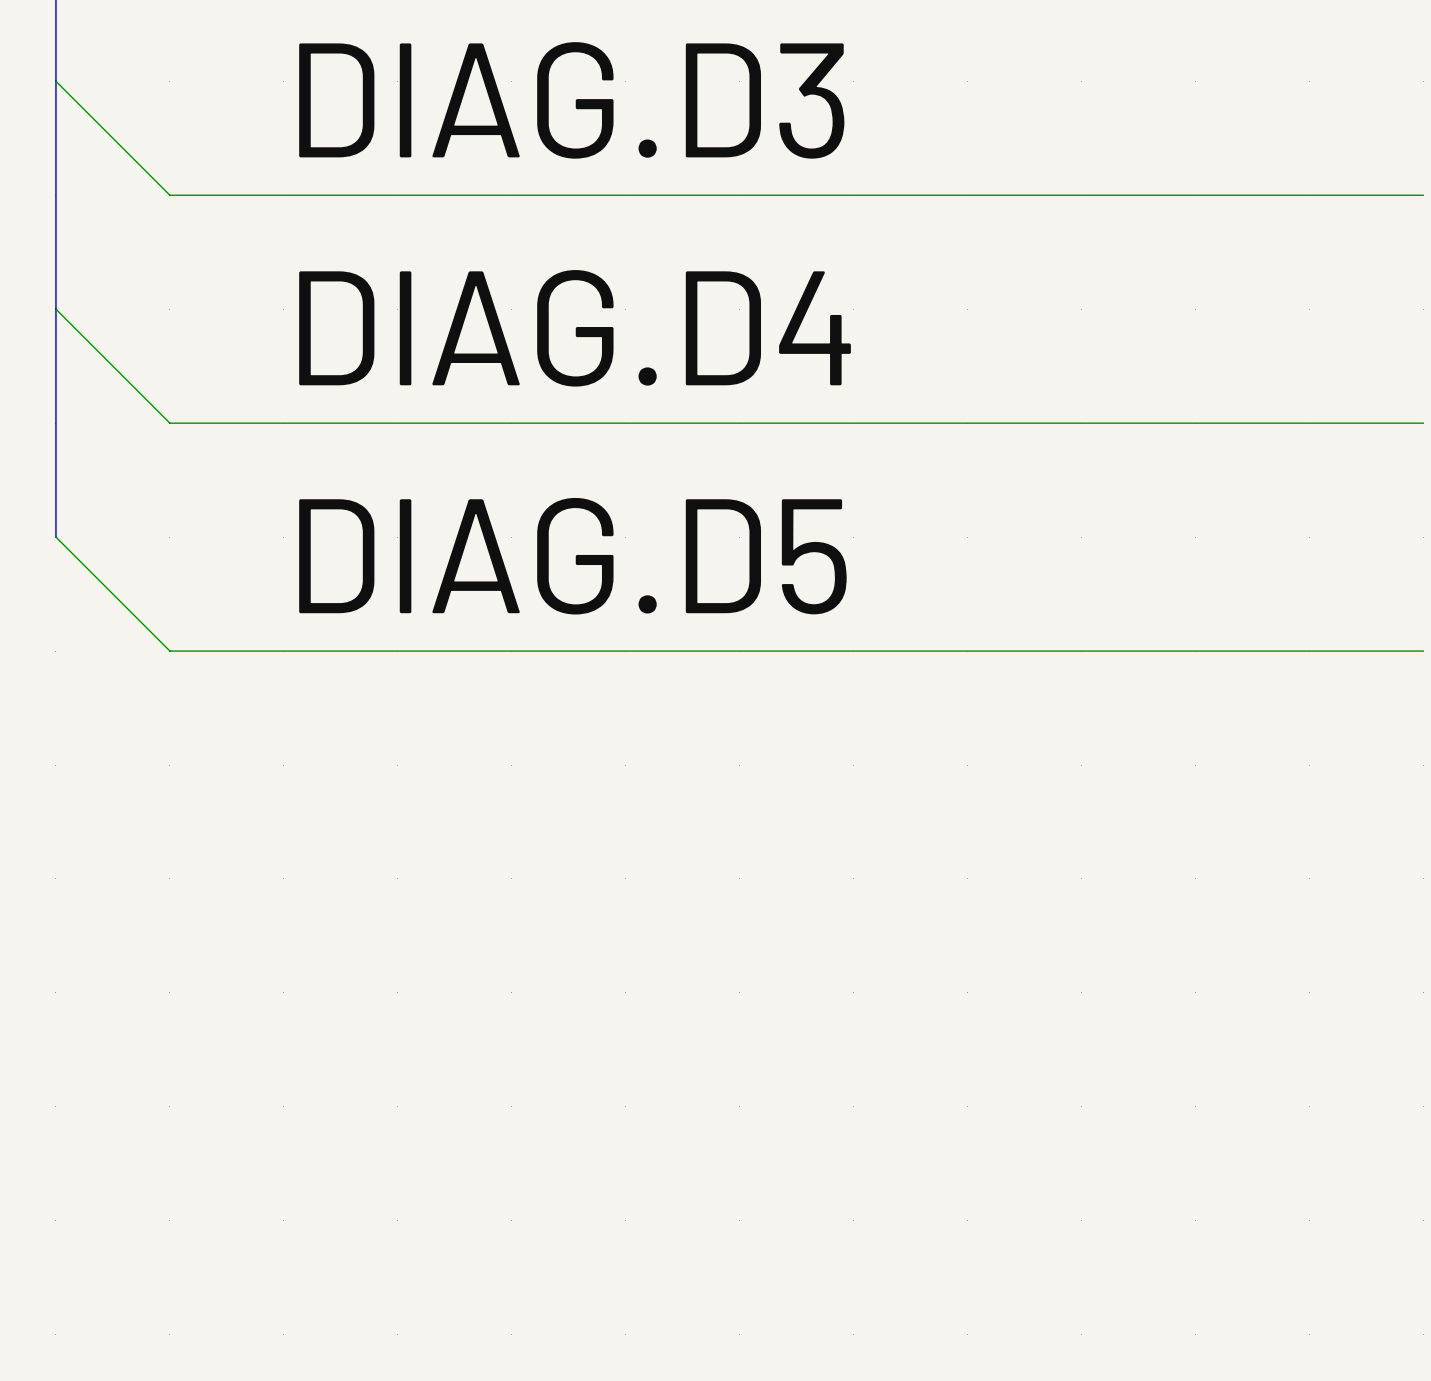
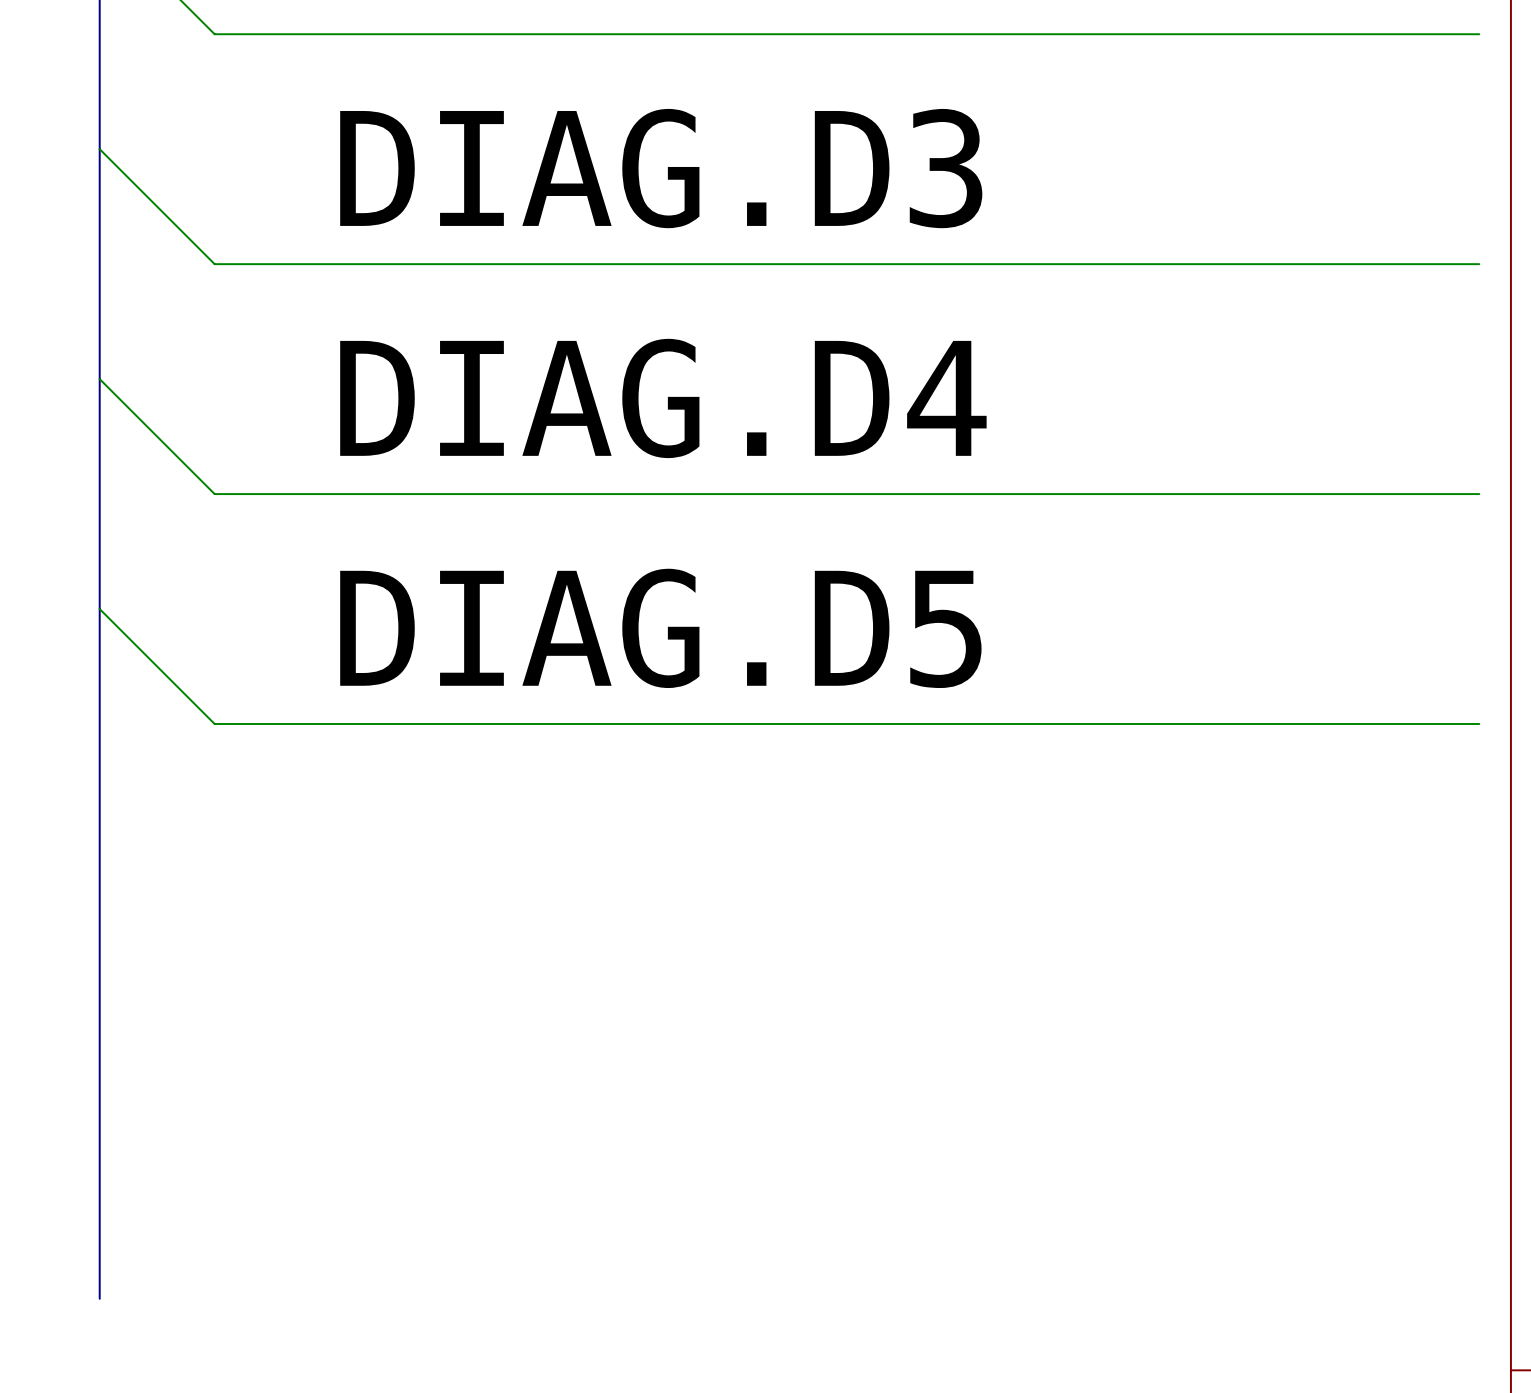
bus: none -> (99, 609) (99, 1298)

